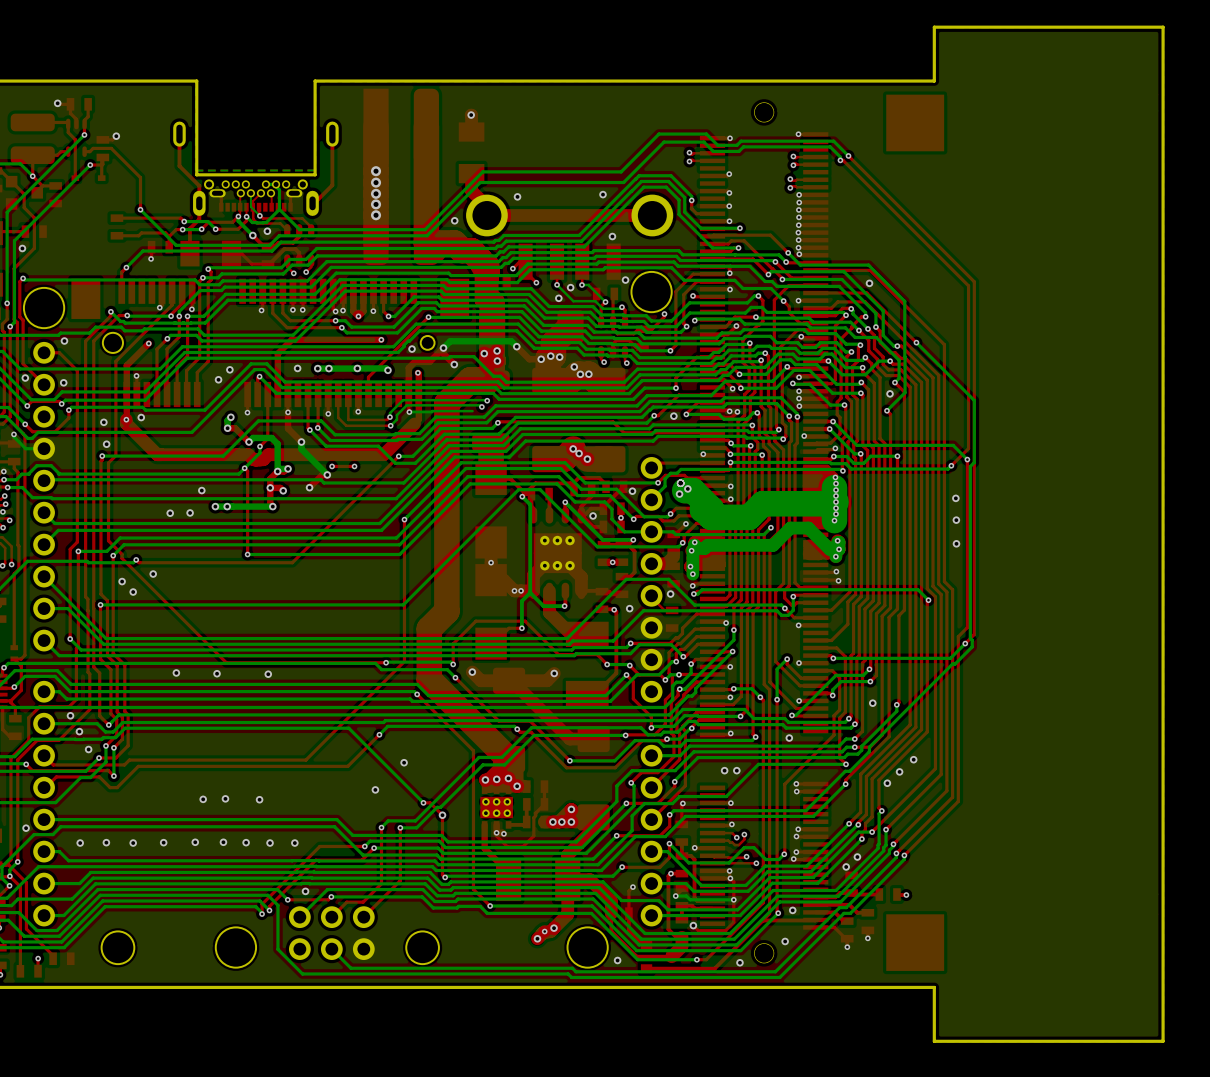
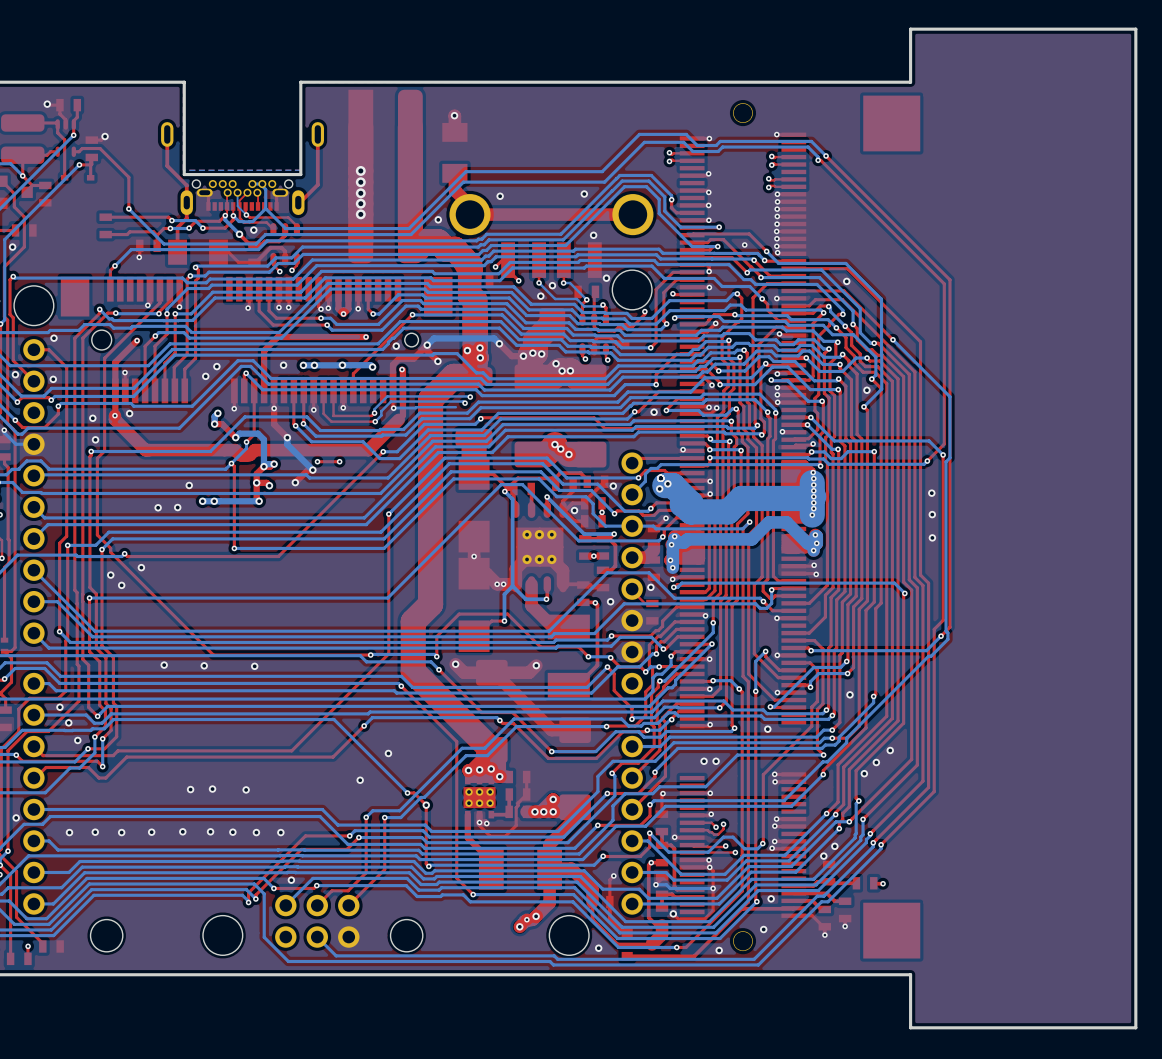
via: none -> (744, 244)

